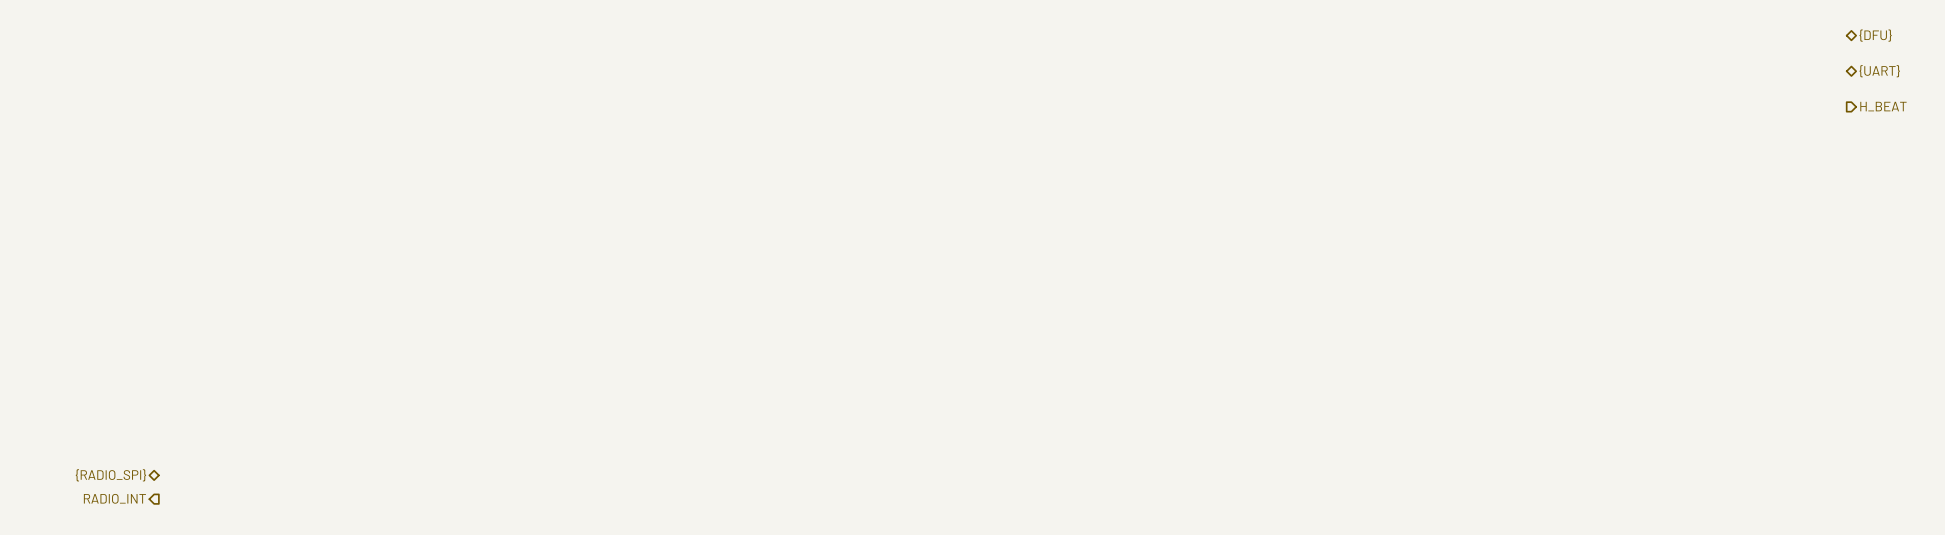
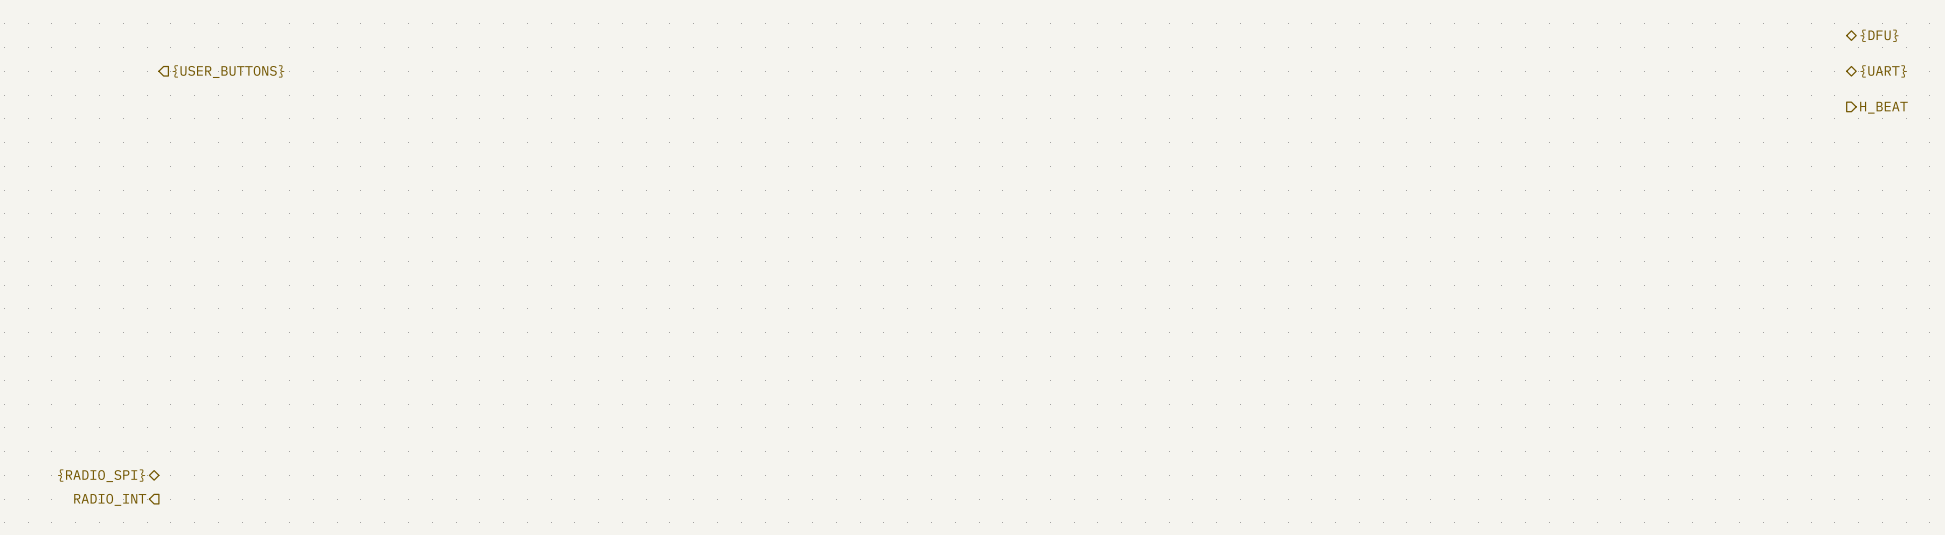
hierarchical label: none -> {USER_BUTTONS} (228, 71)

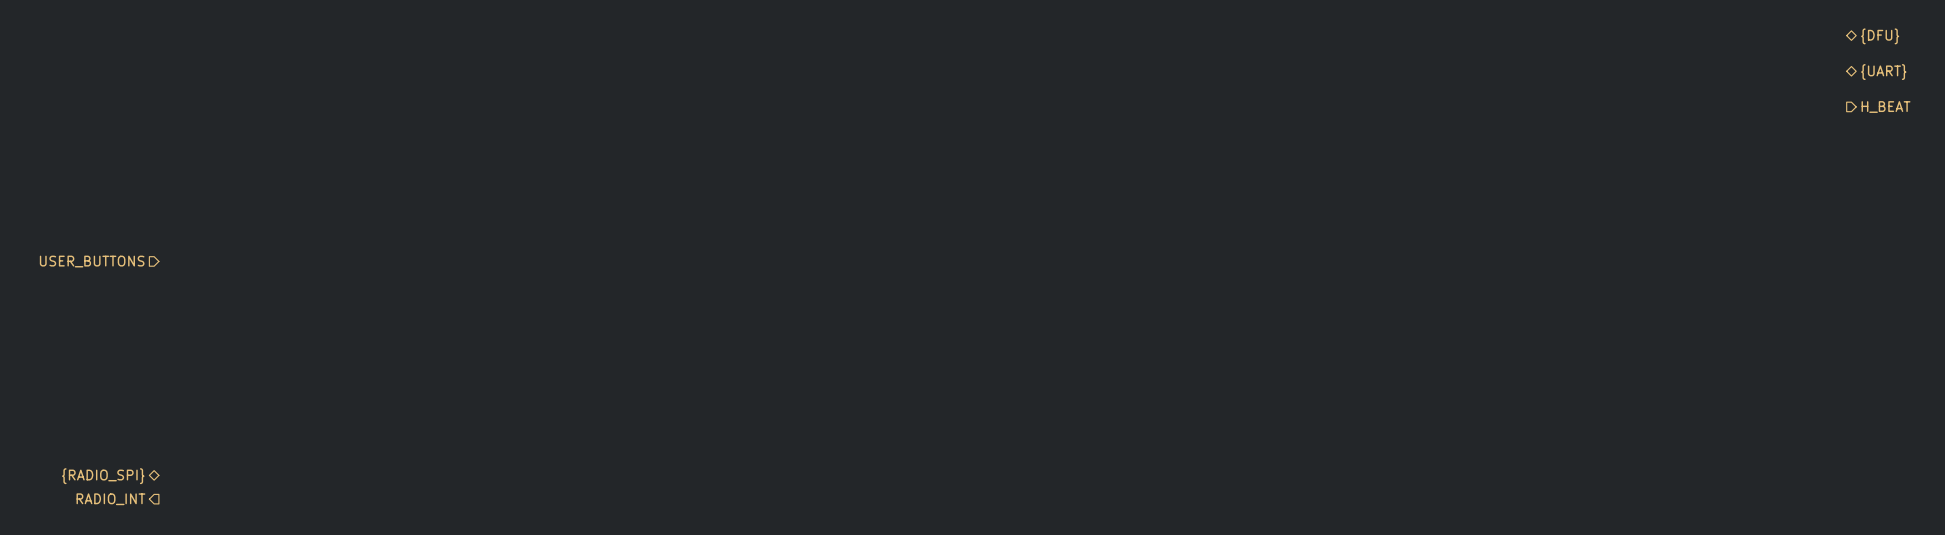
hierarchical label: {USER_BUTTONS} (228, 71) -> none
hierarchical label: none -> USER_BUTTONS (92, 261)

